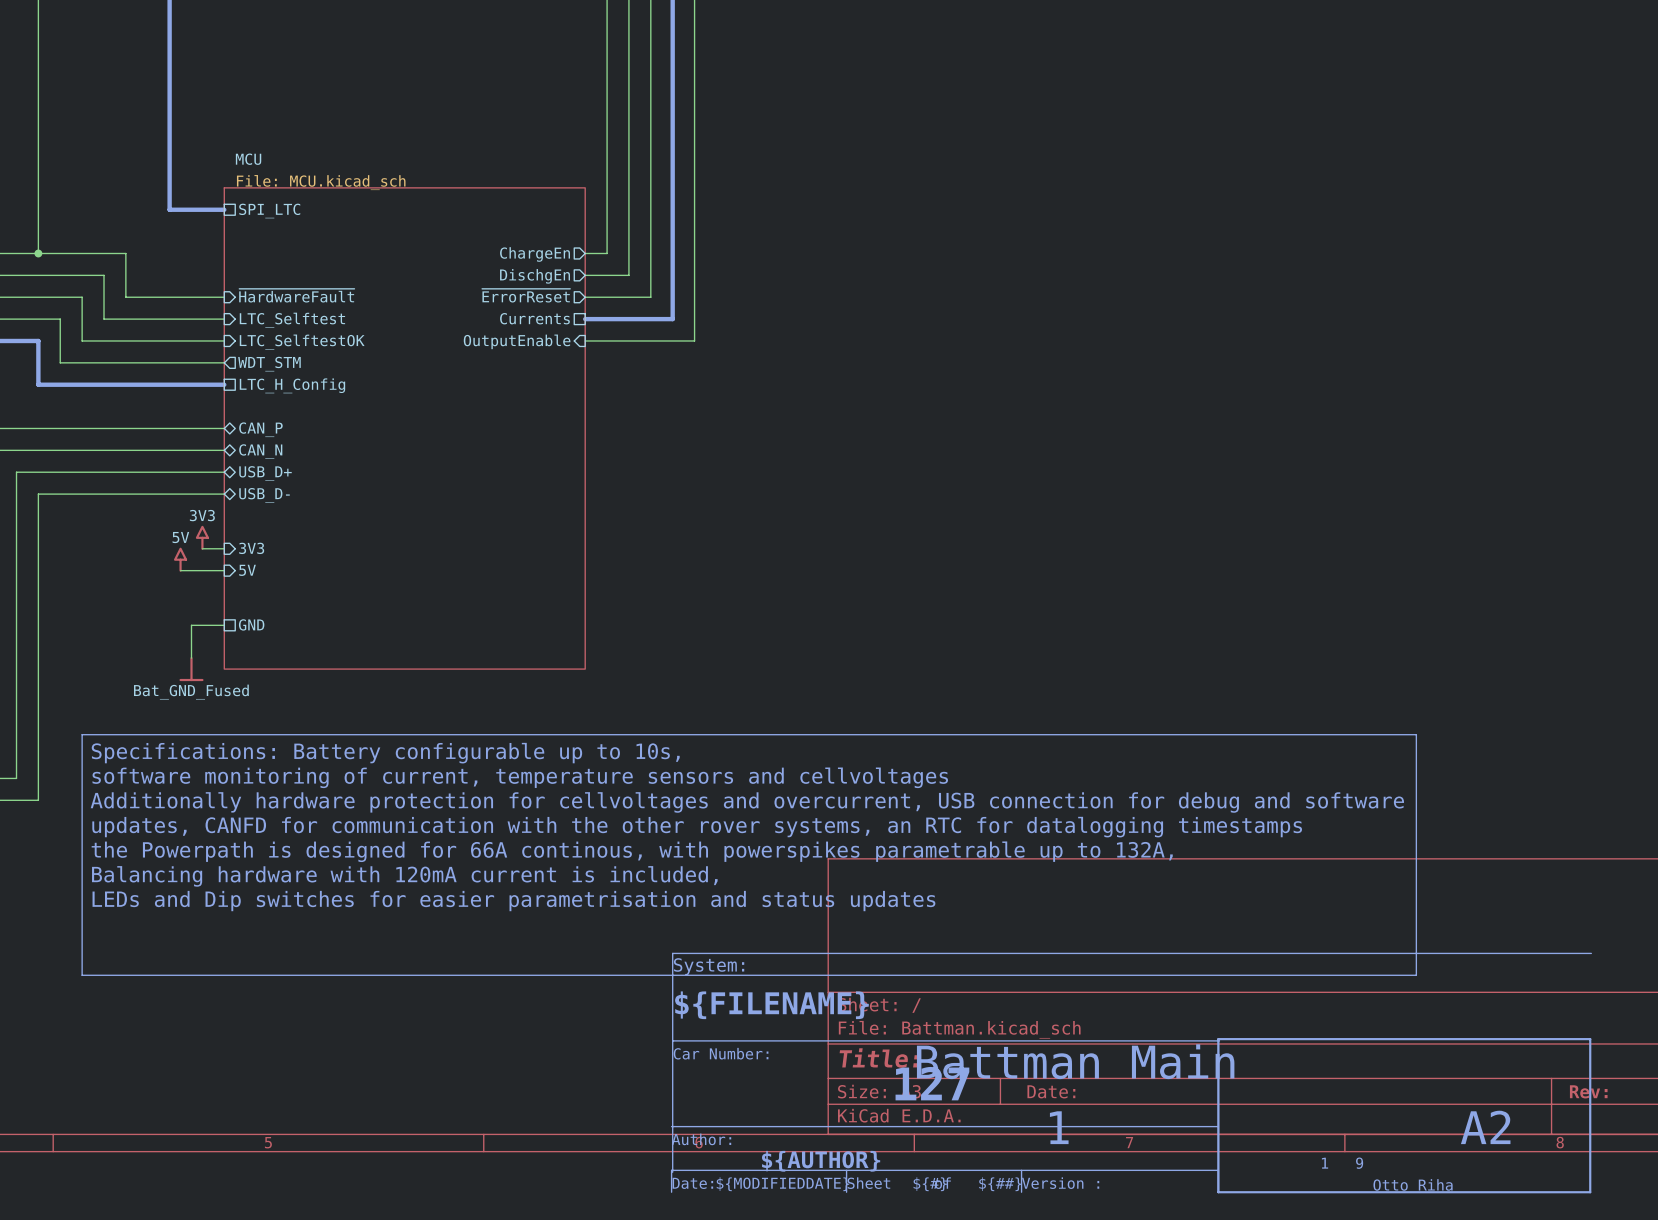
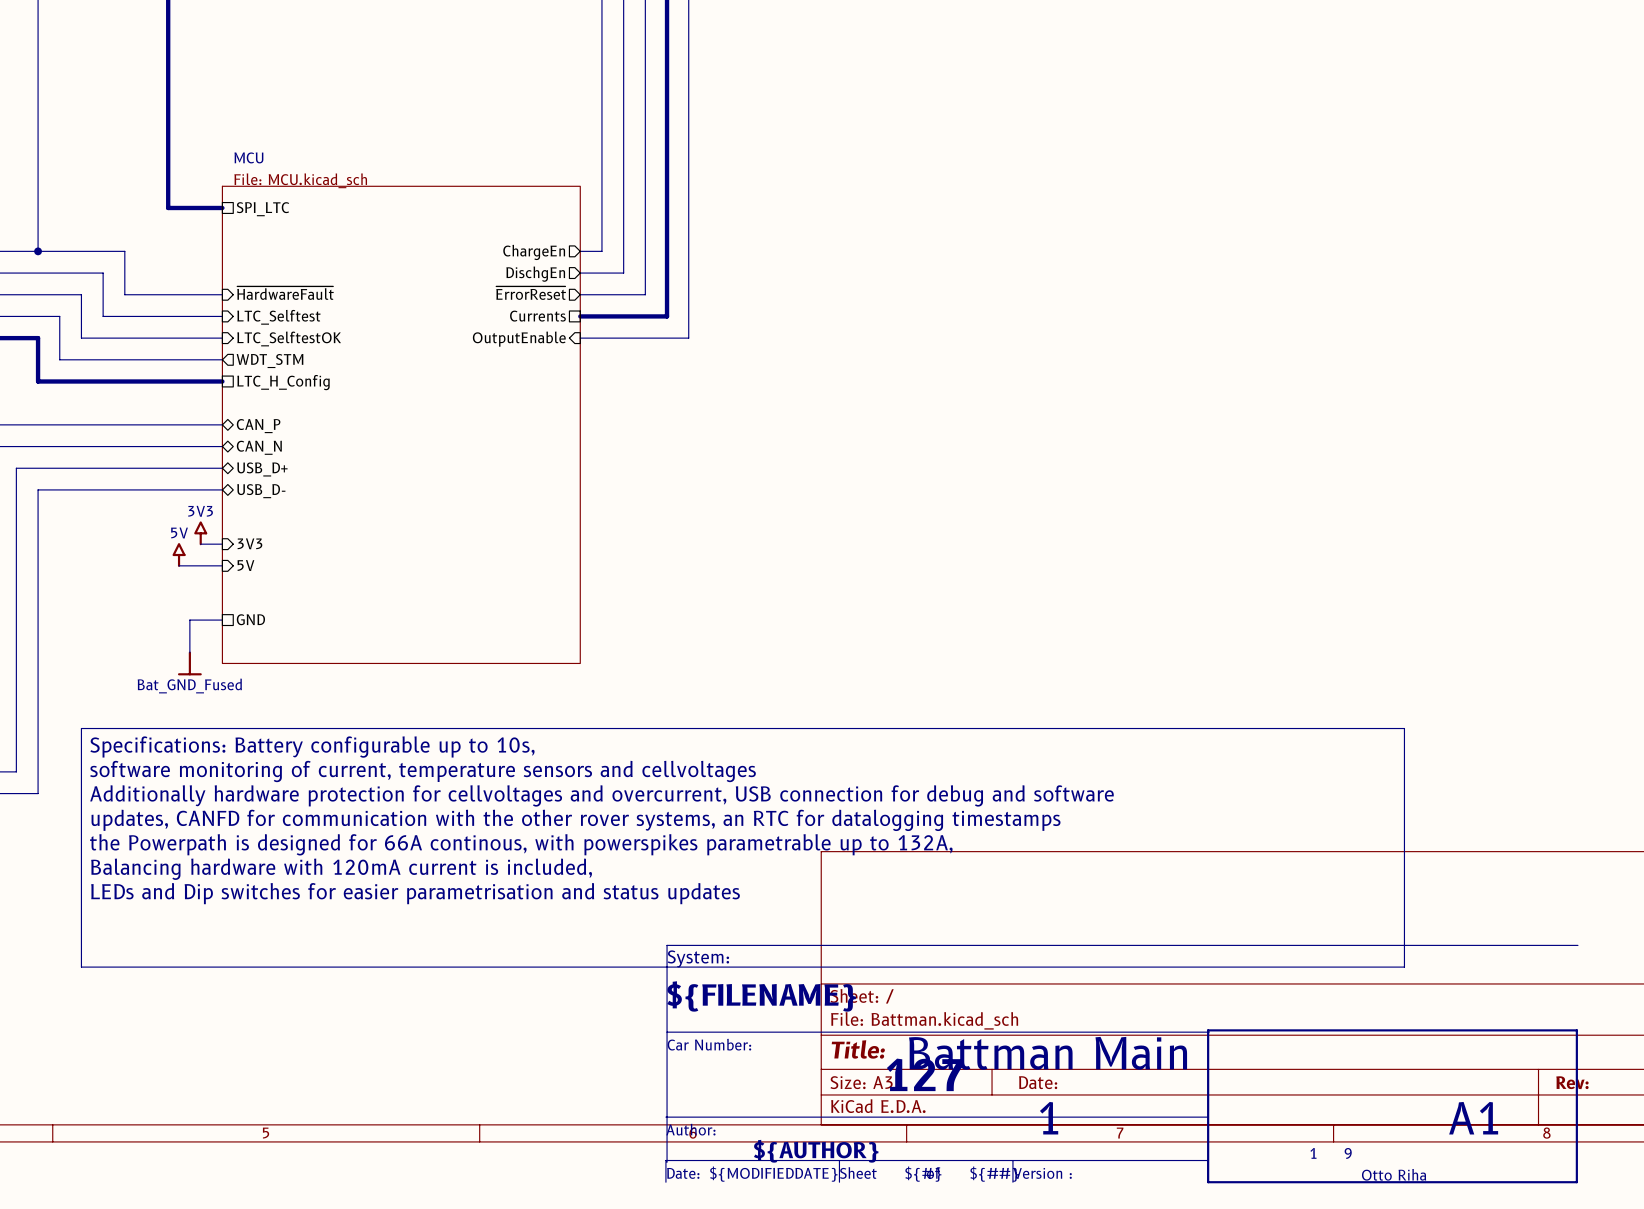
text: A2 (1485, 1127) -> A1 (1473, 1118)

